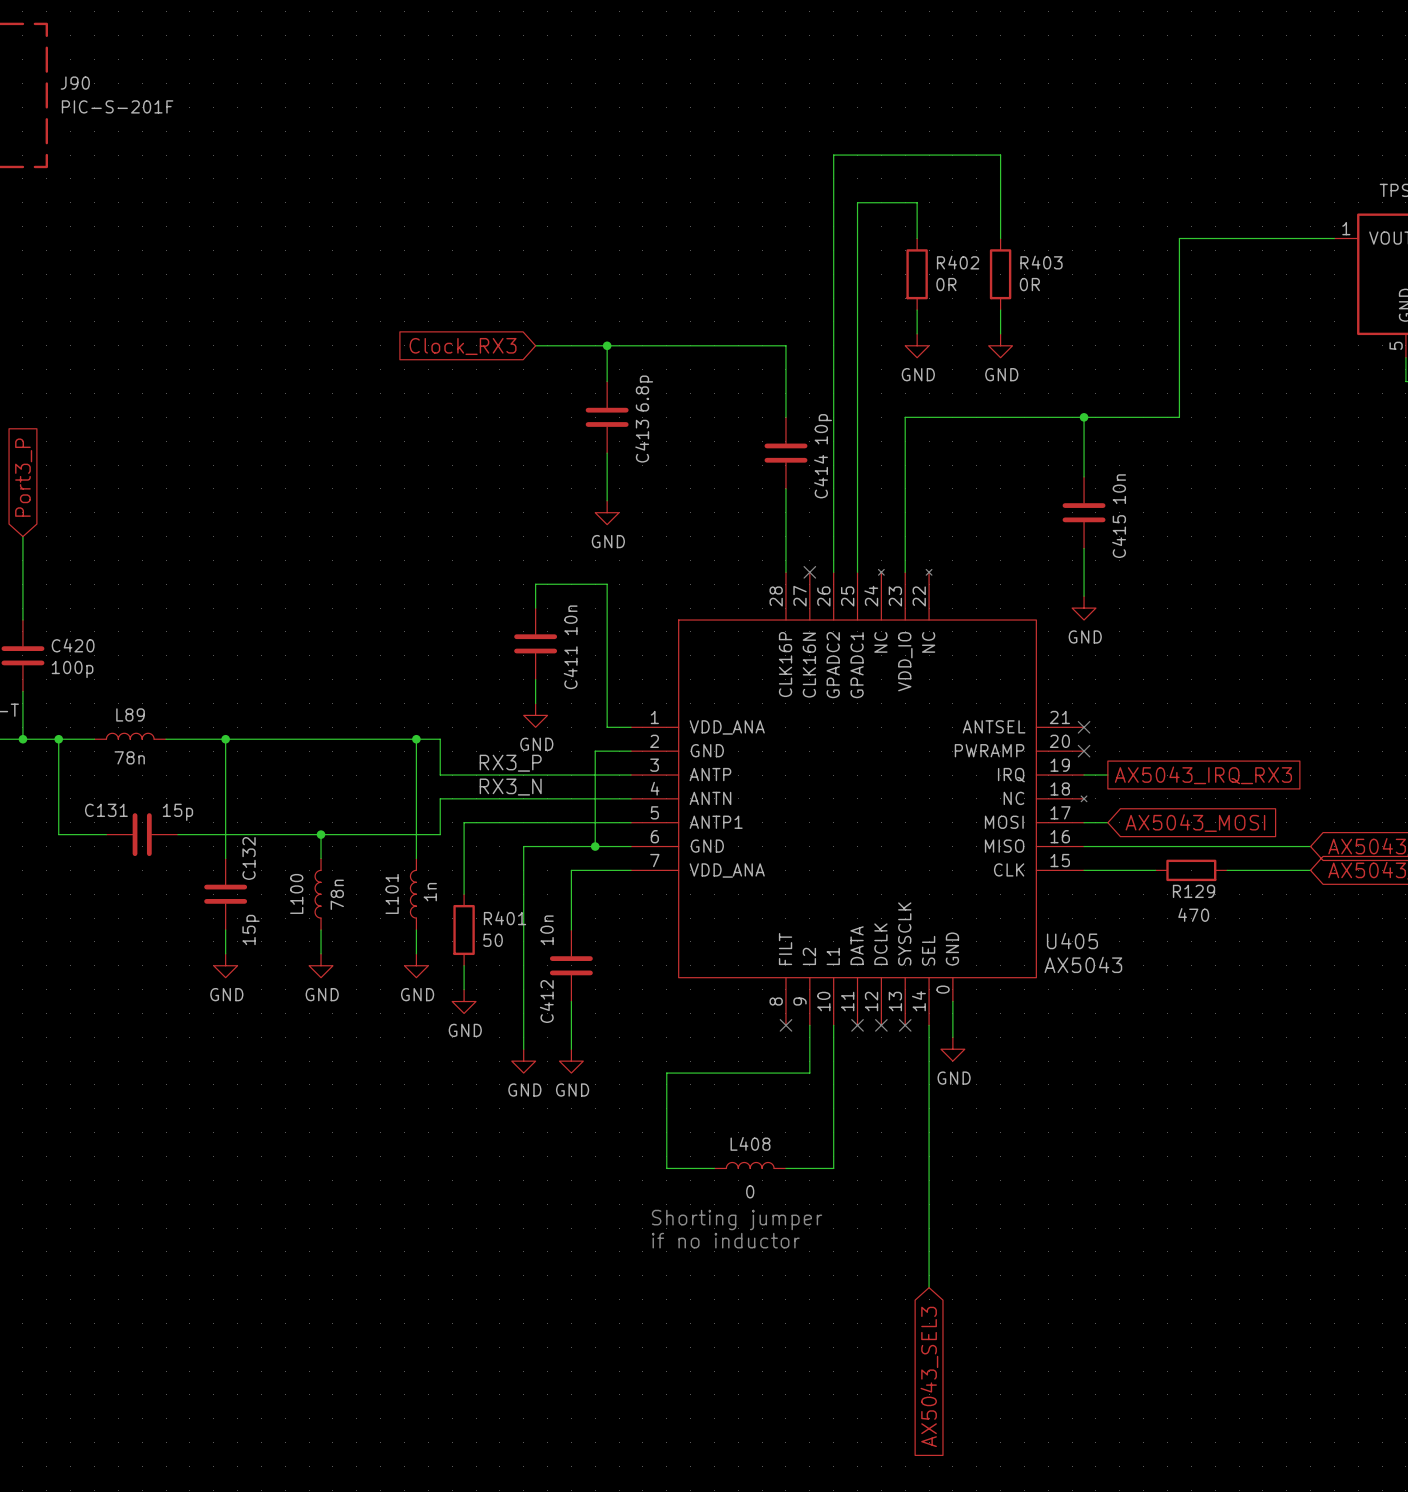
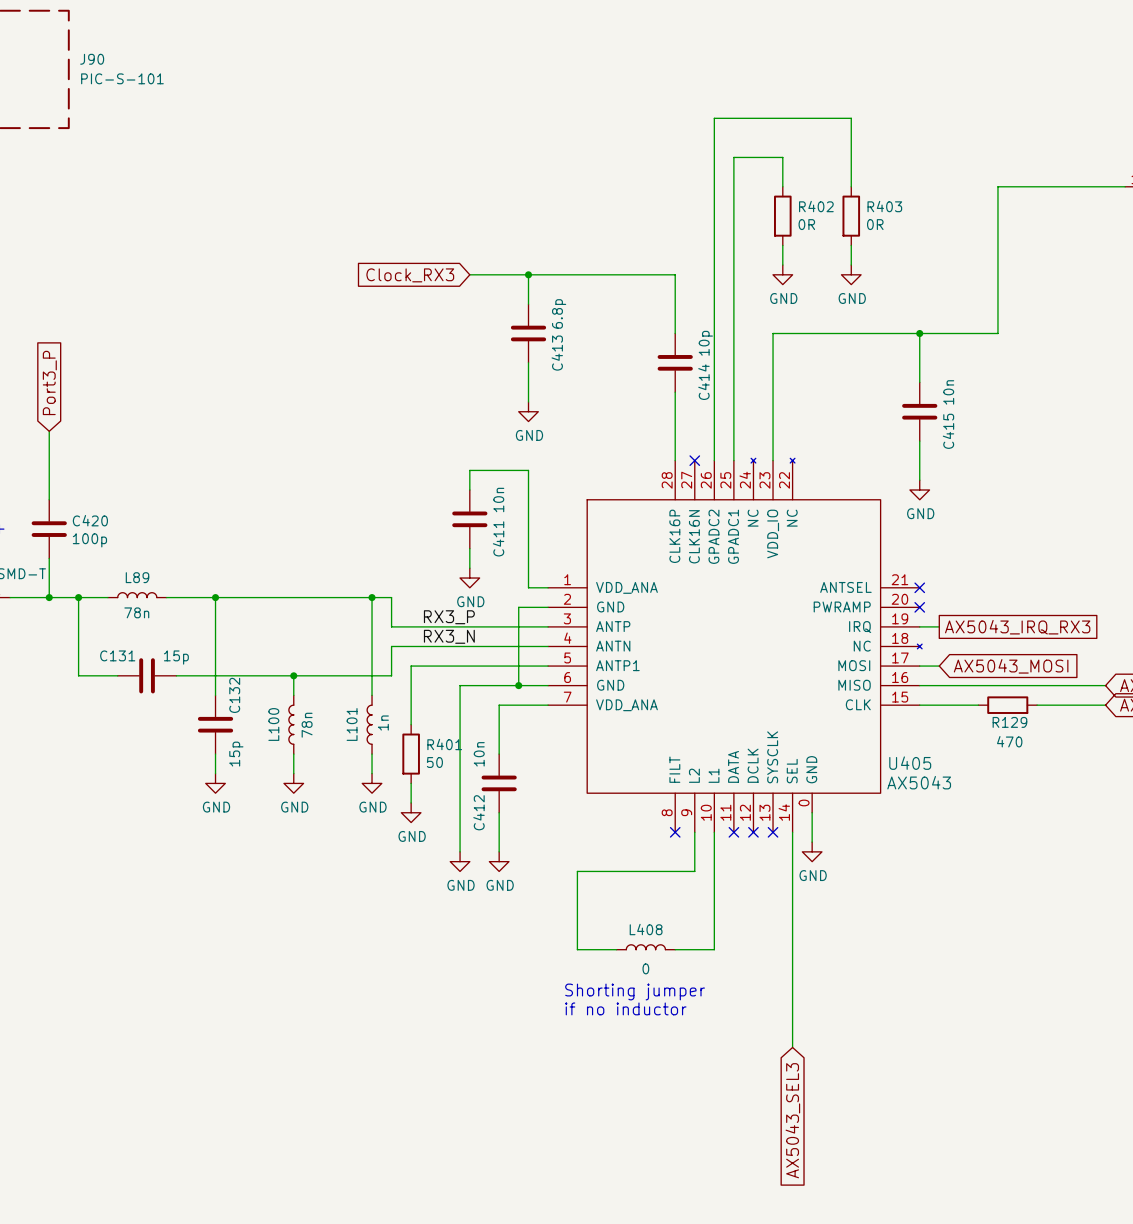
J90 value: PIC-S-201F (117, 106) -> PIC-S-101 (122, 78)

